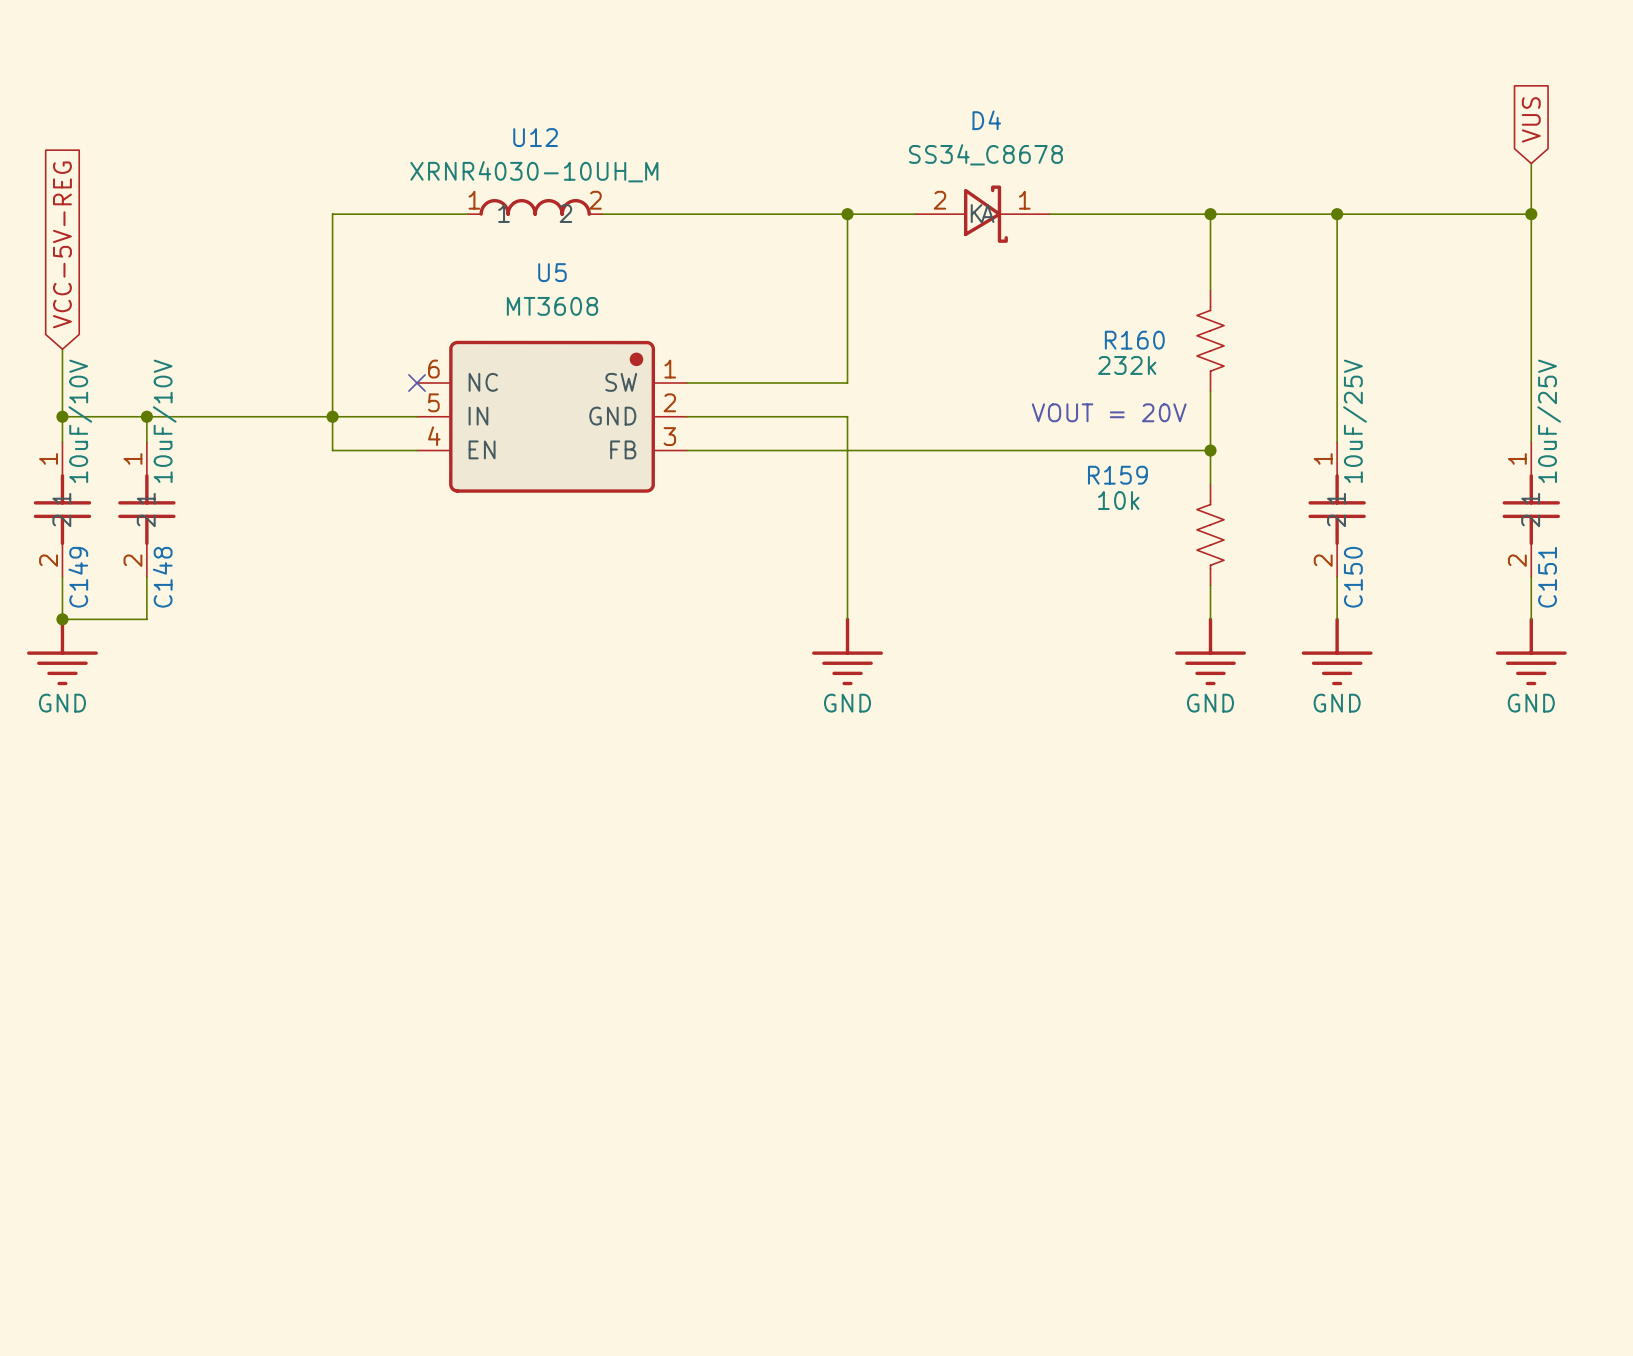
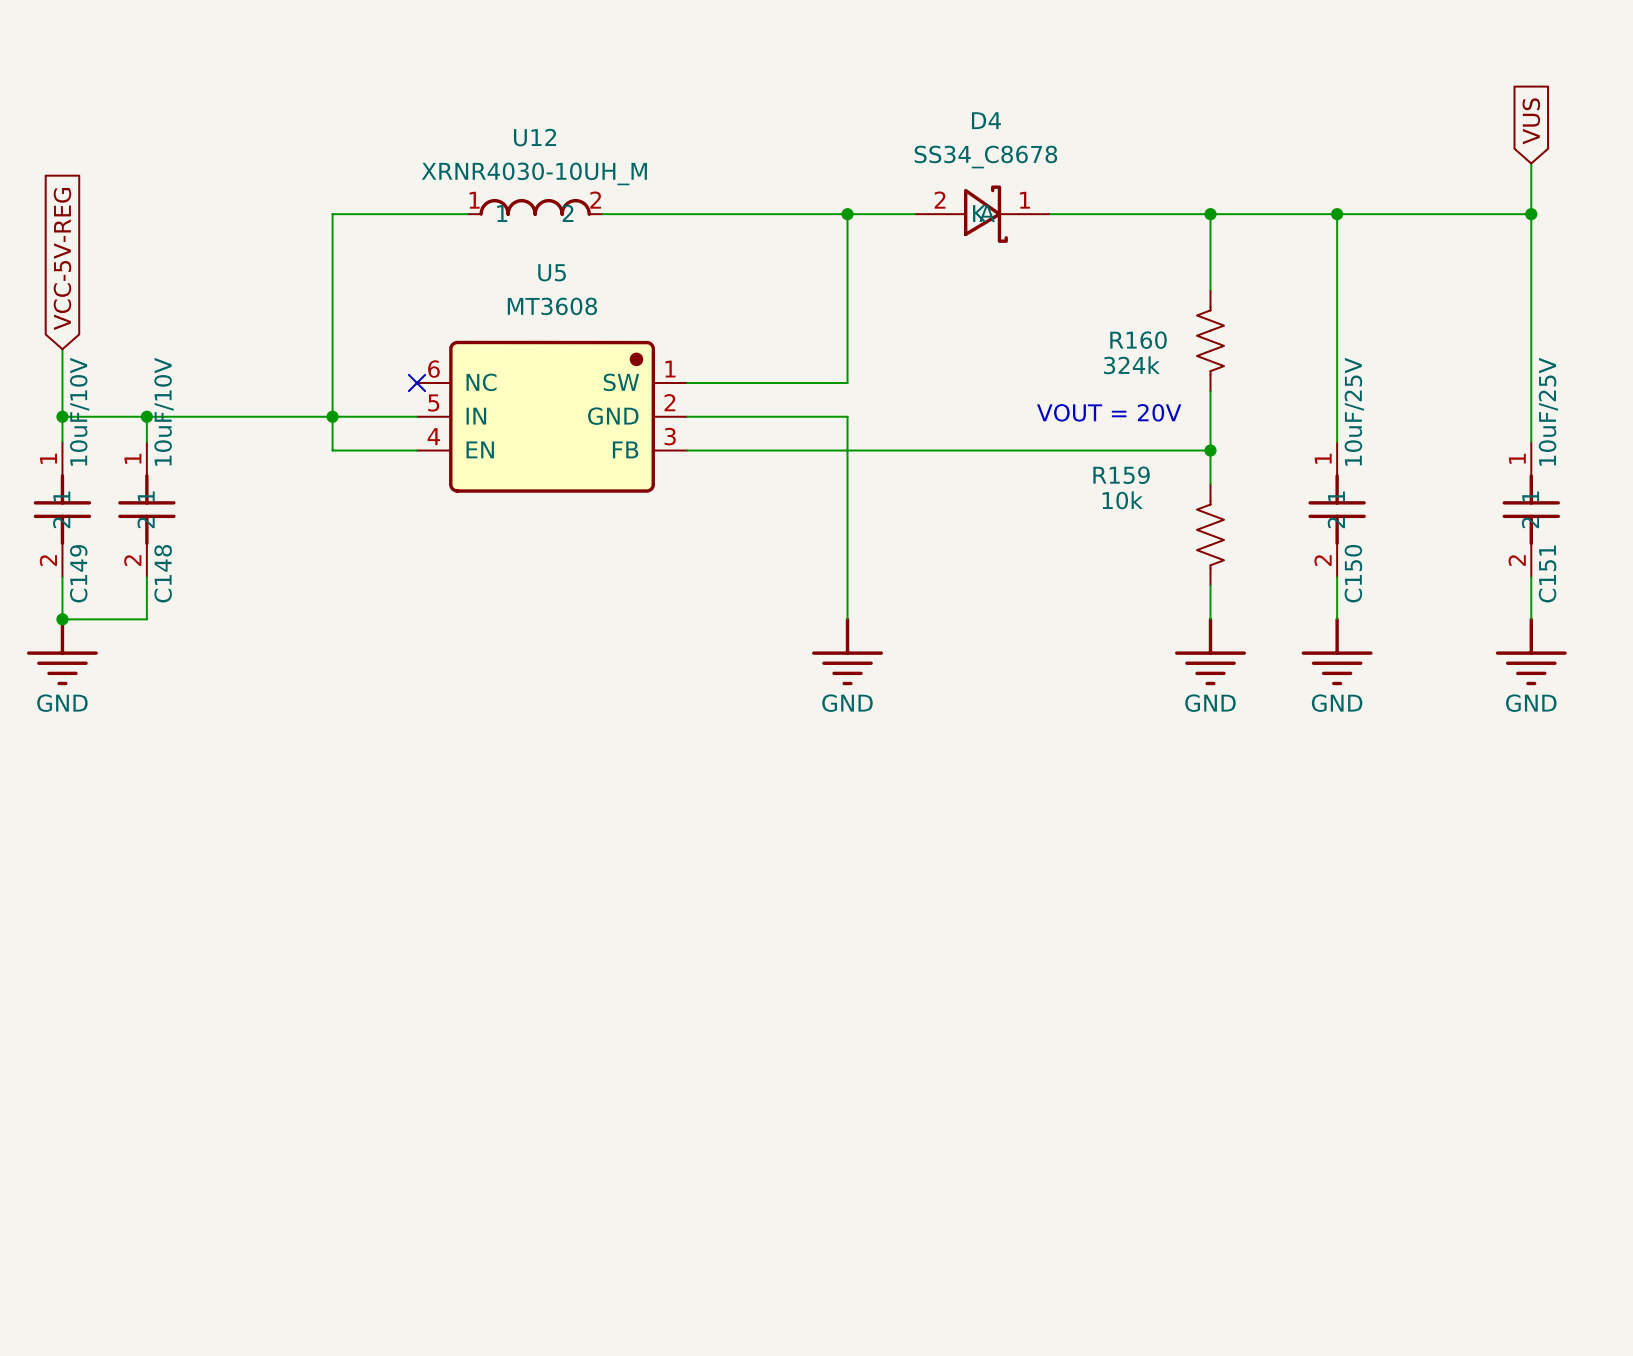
R160 value: 232k (1127, 365) -> 324k (1131, 365)

